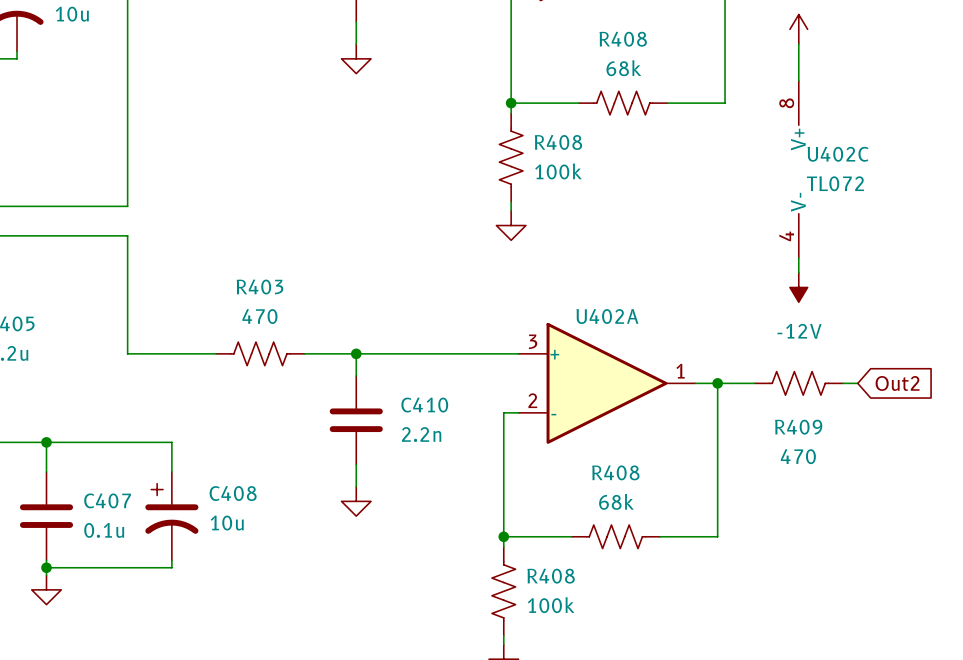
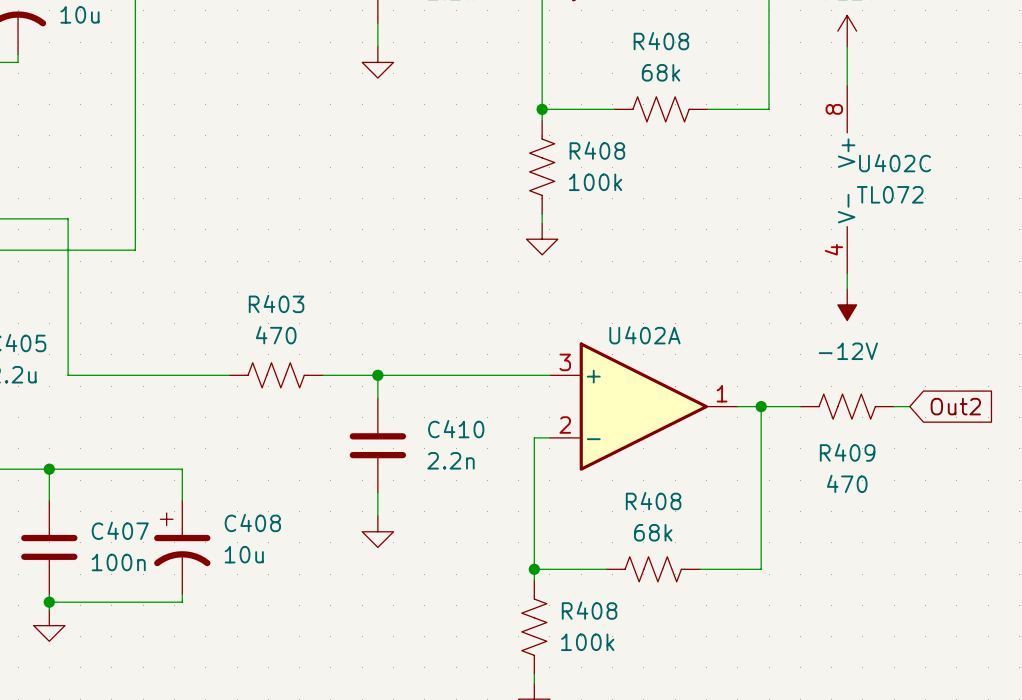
wire: (64, 206) (127, 206) -> (135, 250) (135, 218)
wire: (127, 235) (127, 353) -> (68, 218) (68, 375) (135, 375)
C407 value: 0.1u (104, 530) -> 100n (118, 562)

